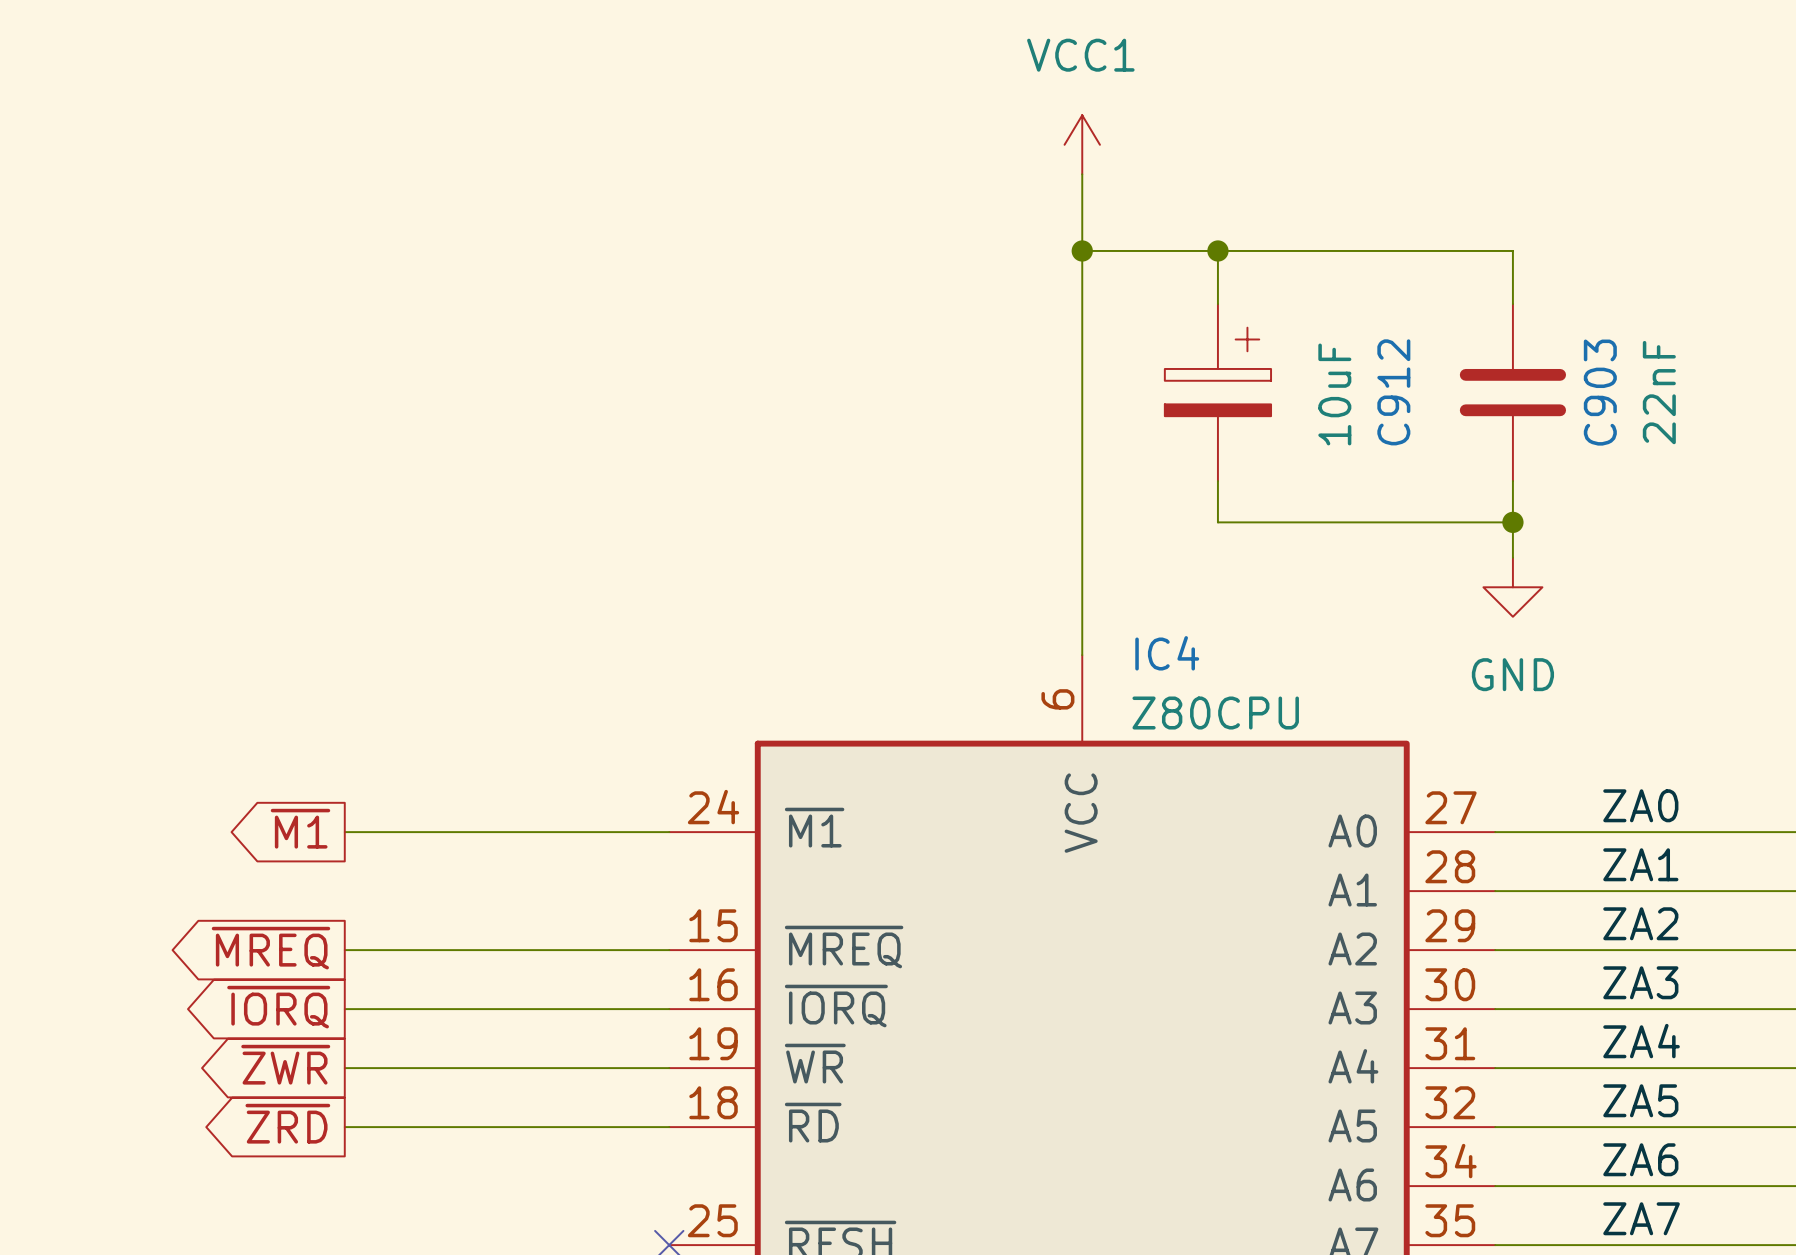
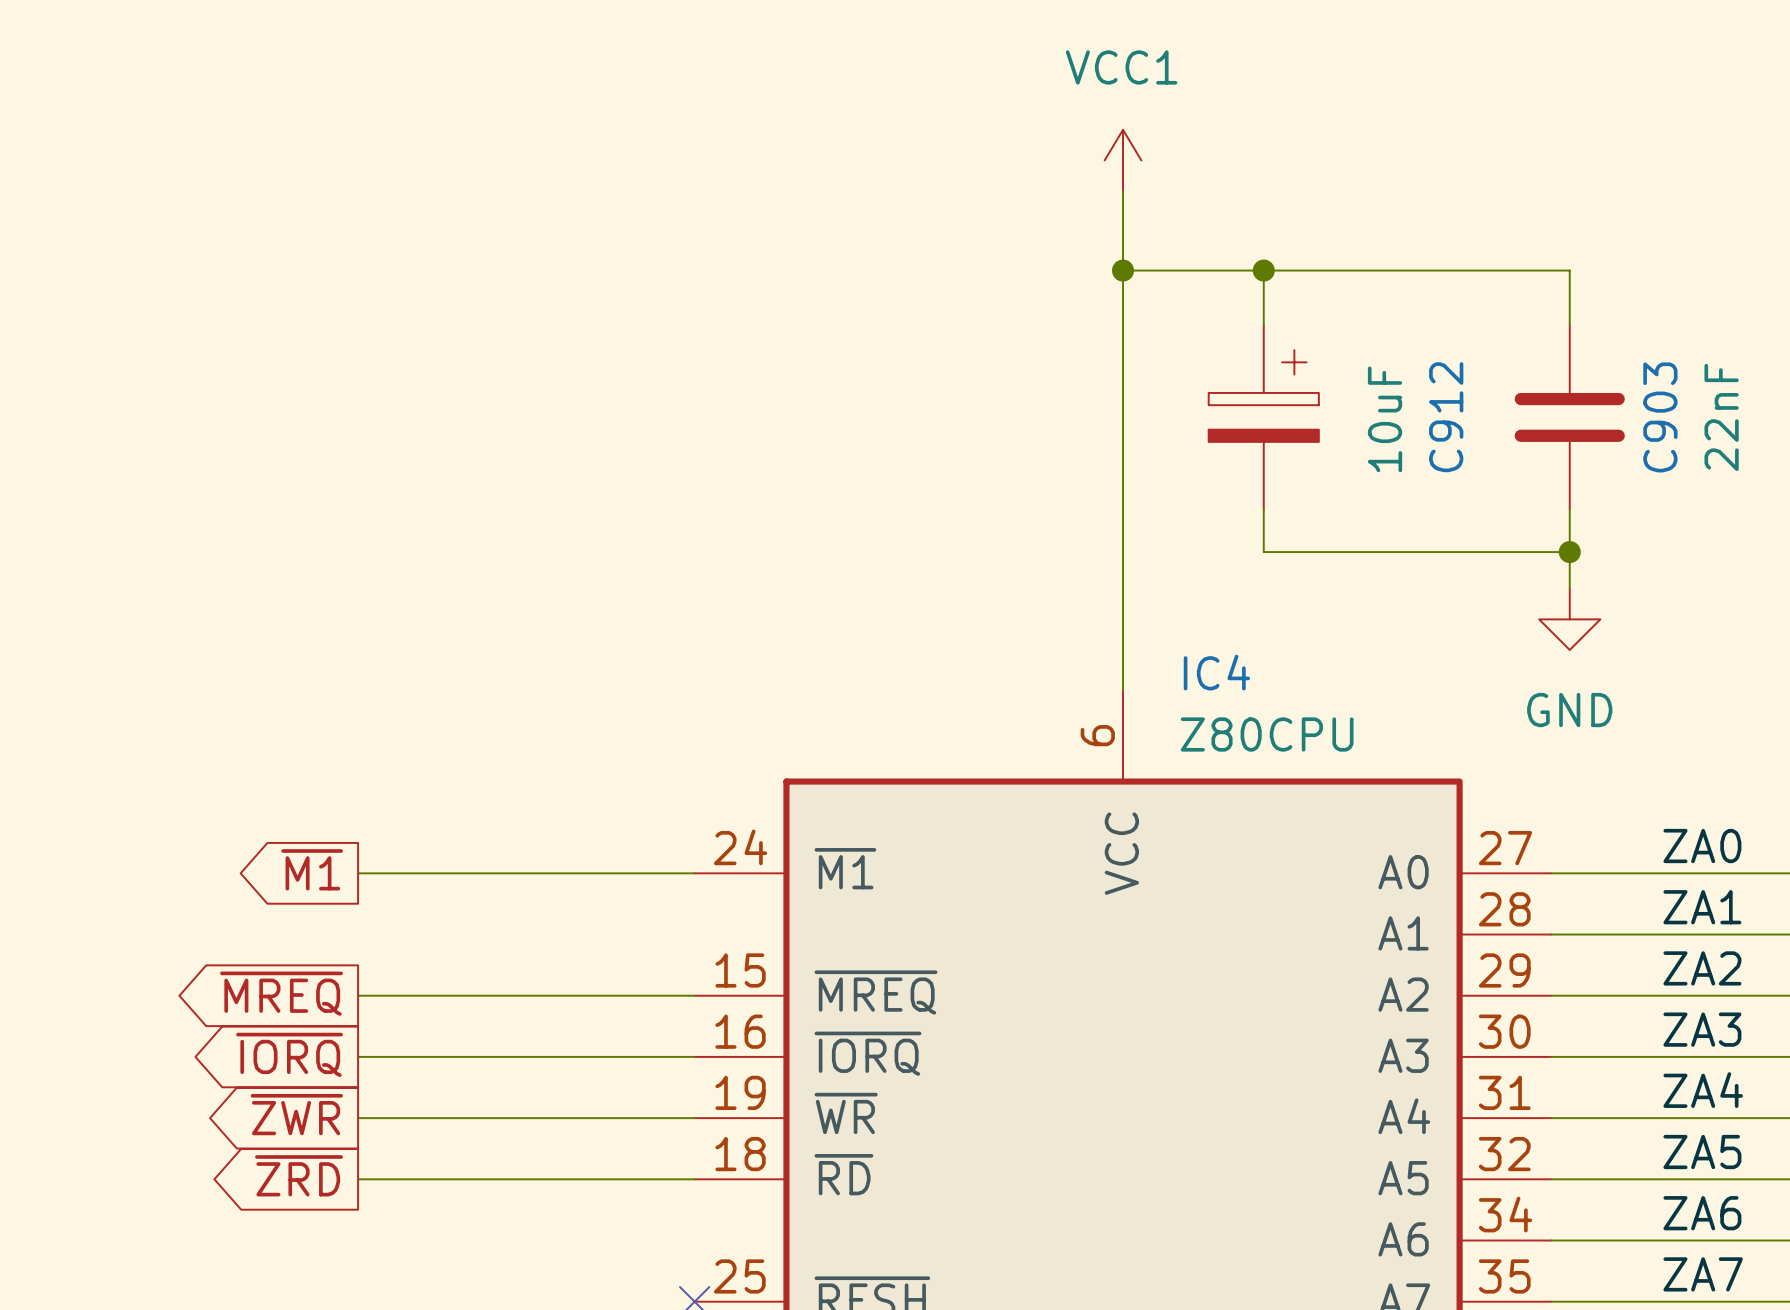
IC4 name position: IC4 (1167, 653) -> IC4 (1216, 672)
IC4 value position: Z80CPU (1215, 713) -> Z80CPU (1267, 734)

